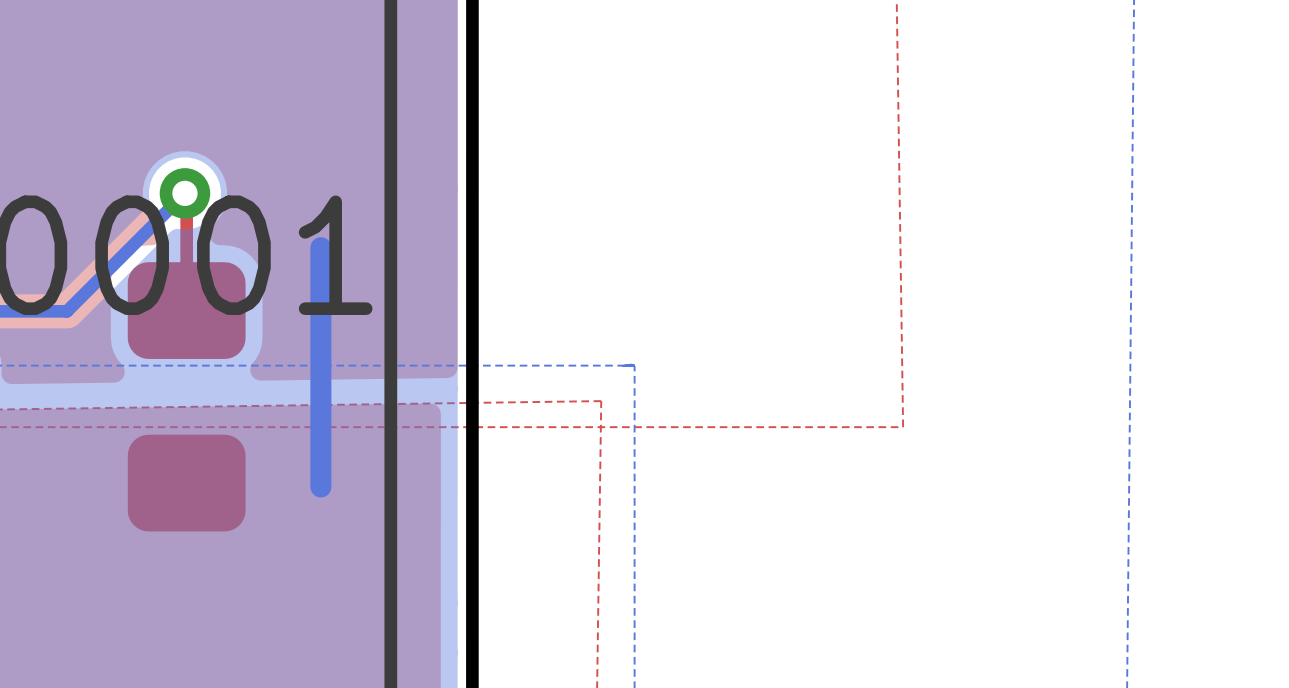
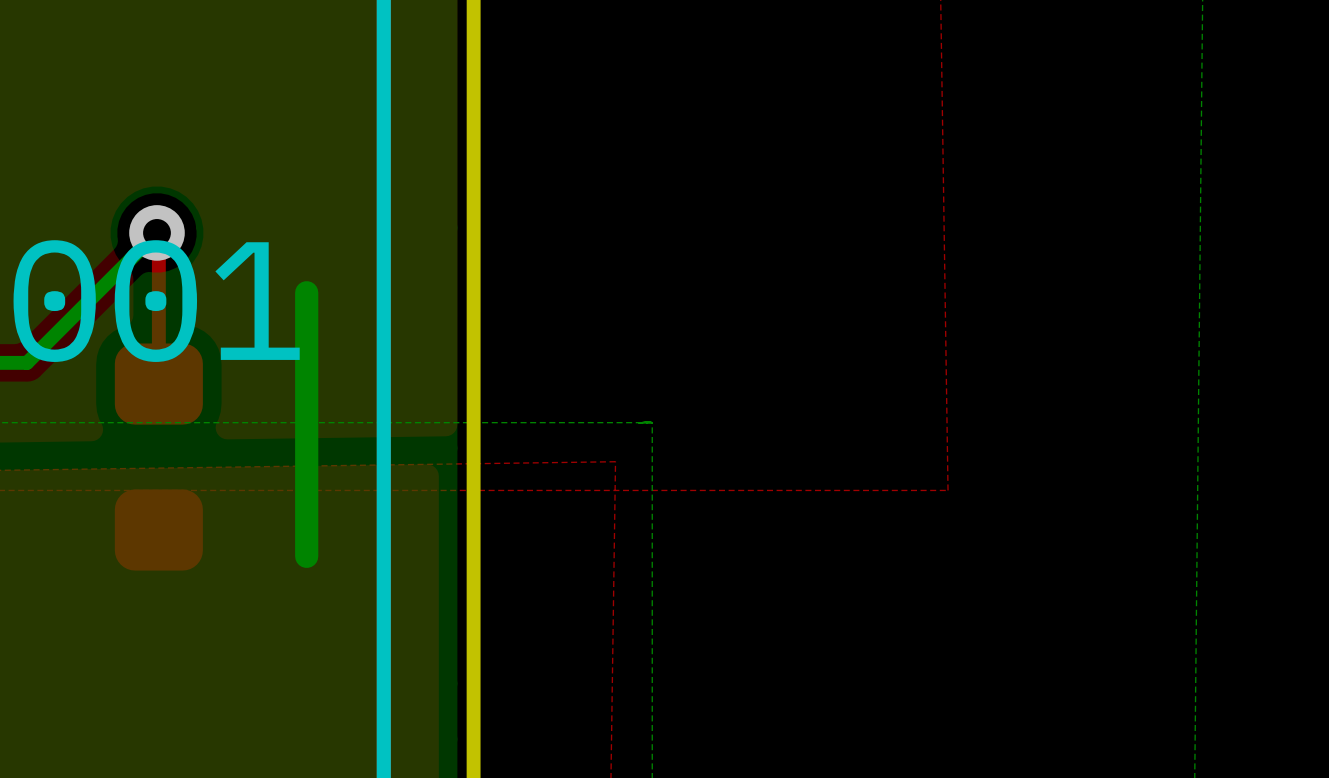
part footprint: [127, 262, 246, 532] -> [114, 343, 203, 571]

